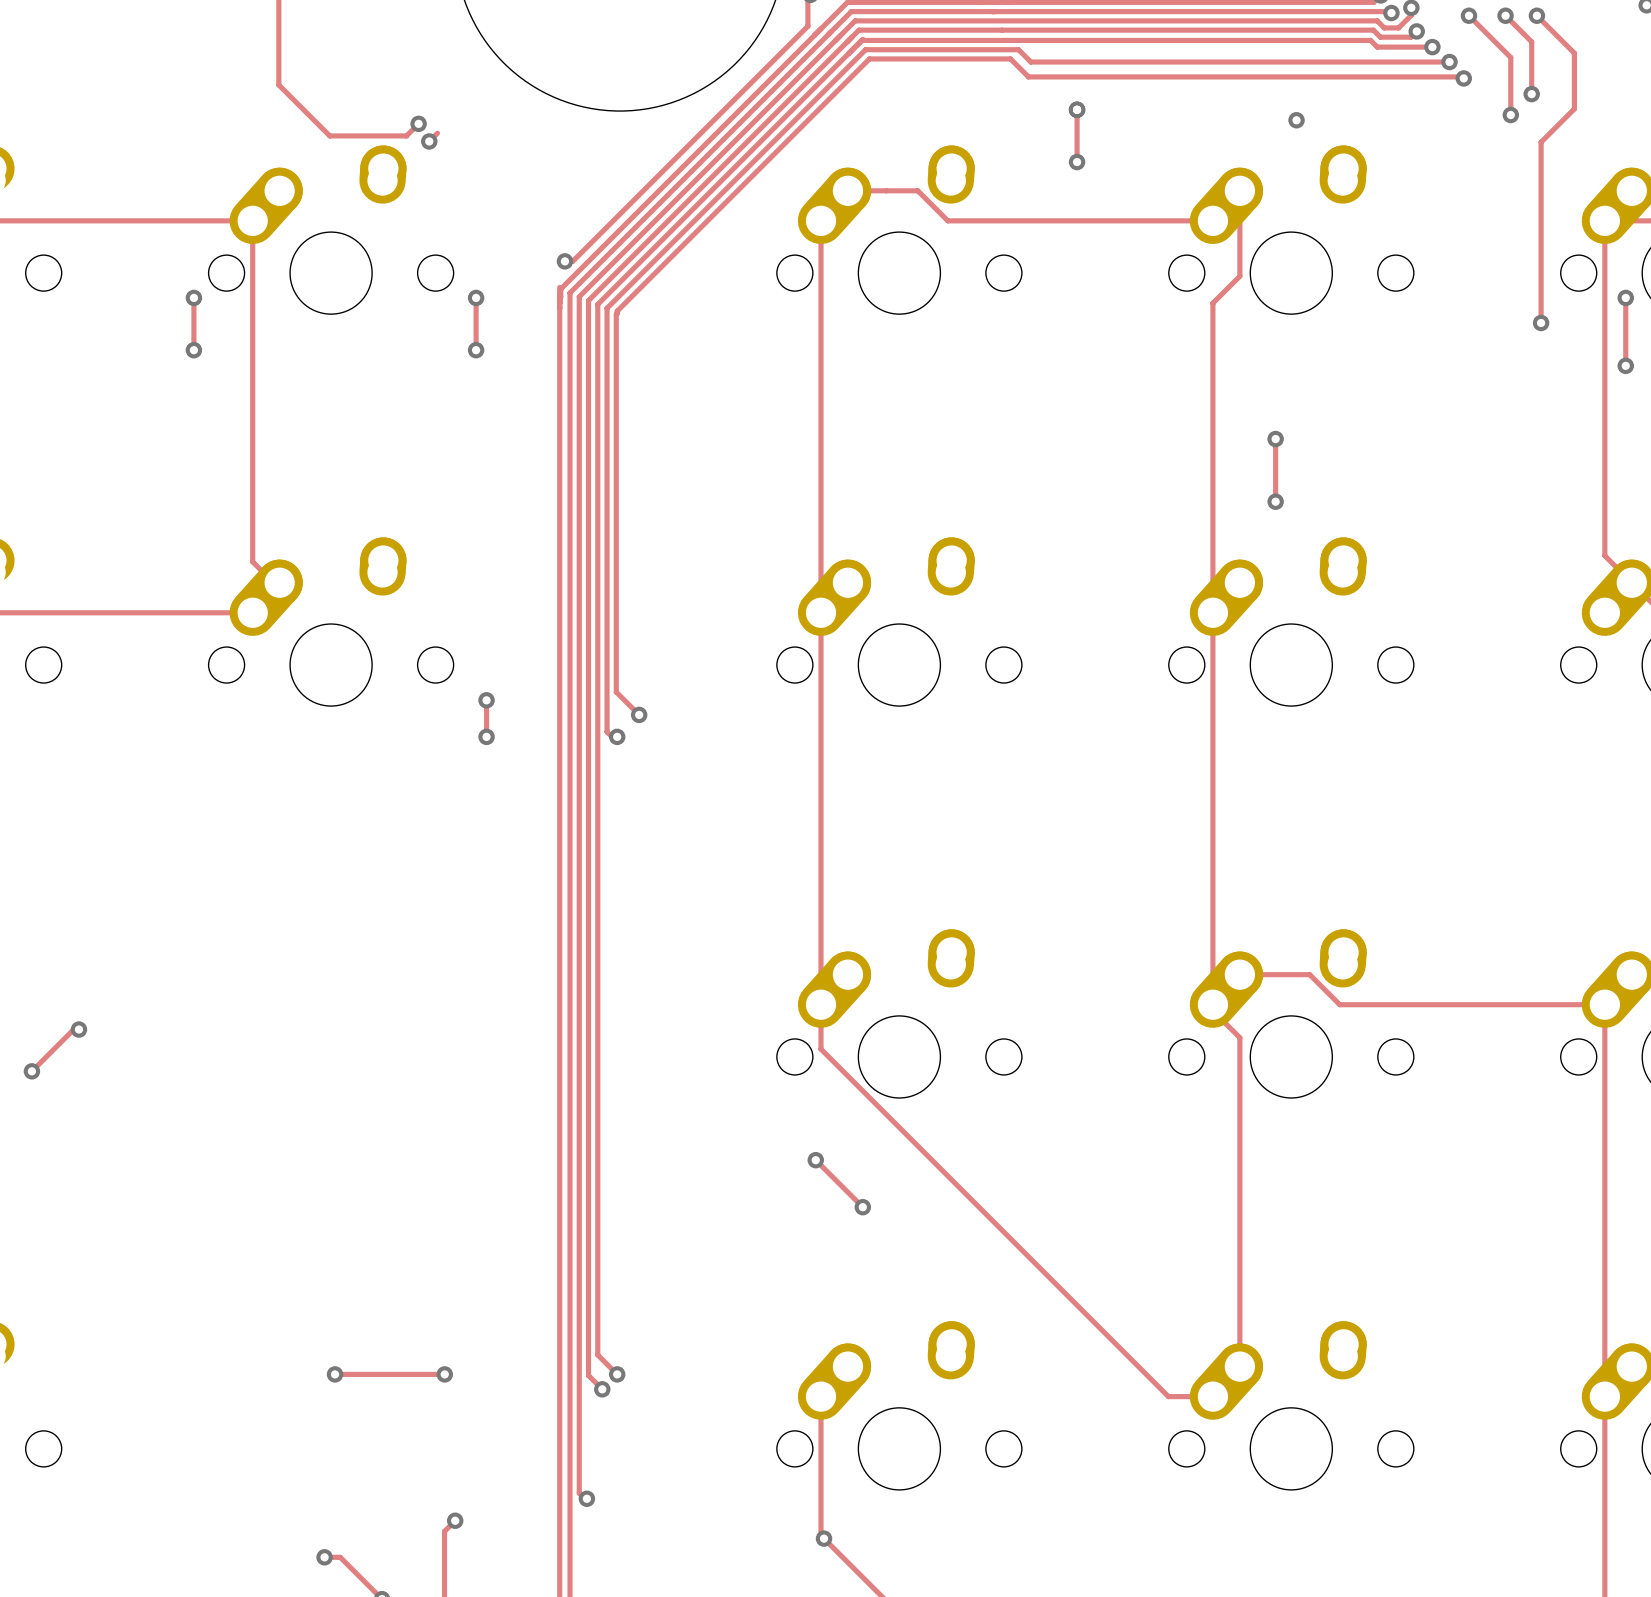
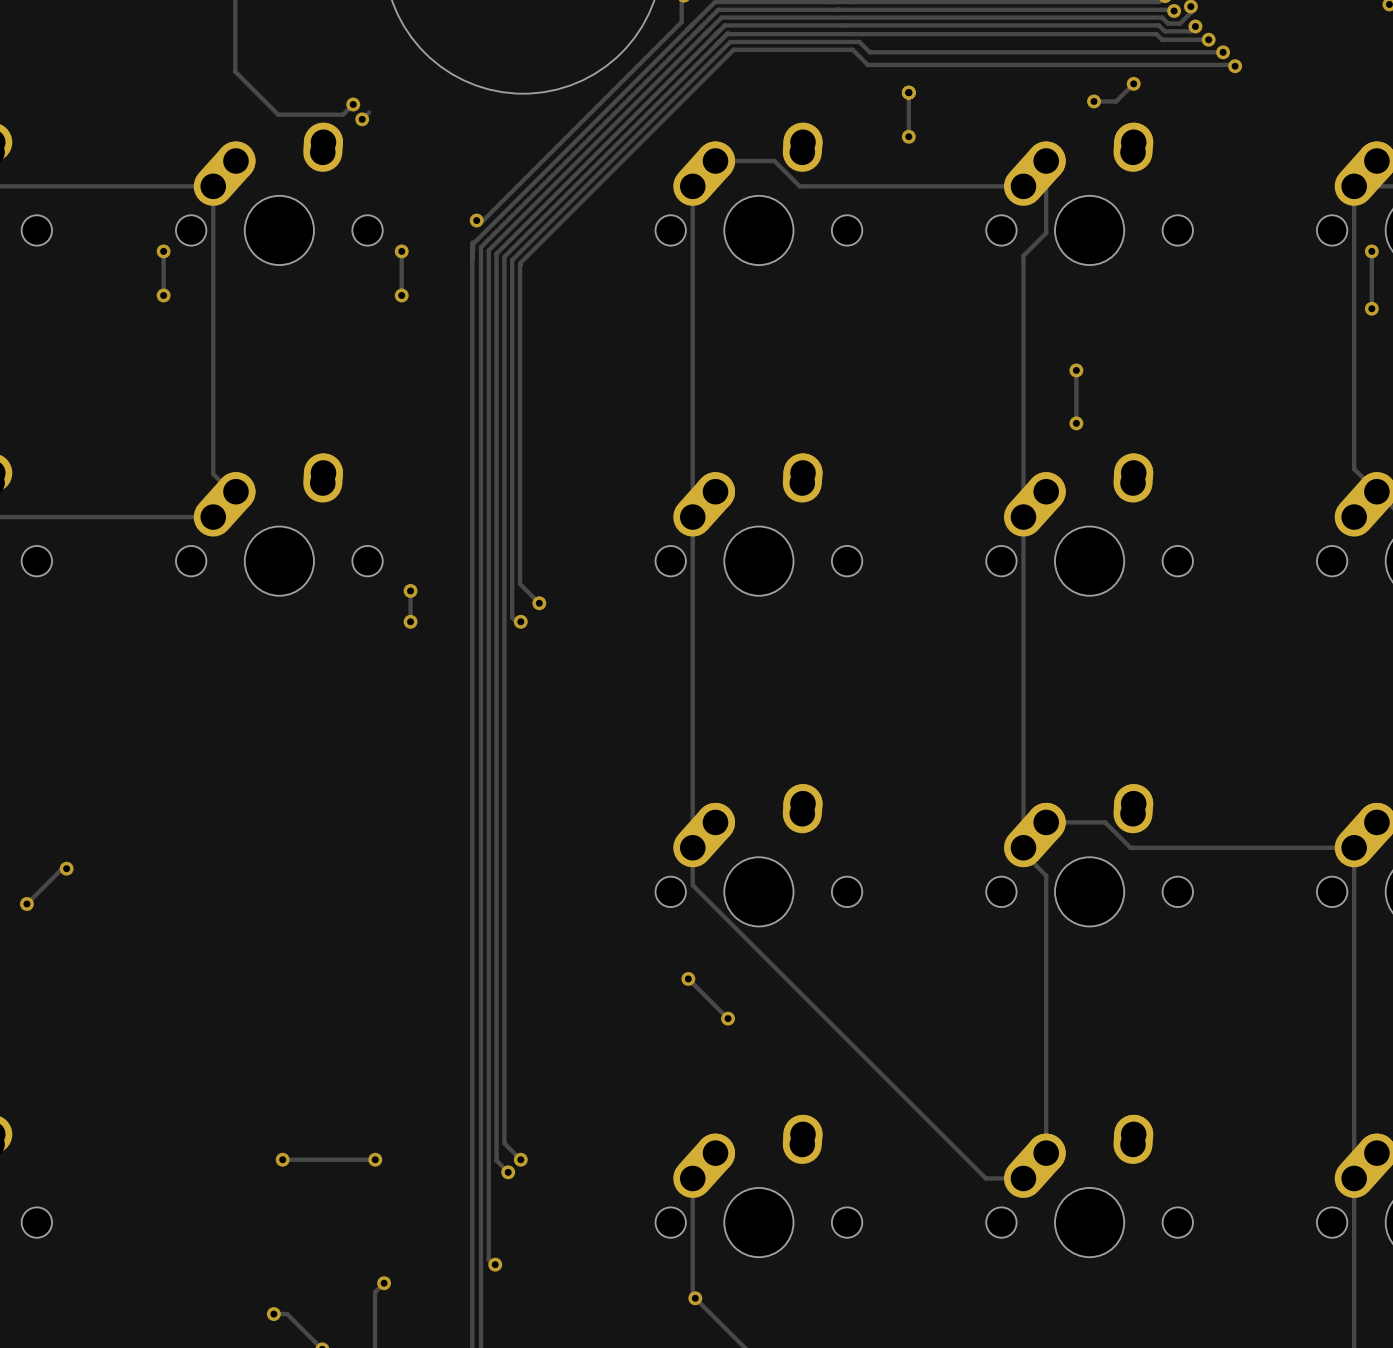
track: (1468, 15) (1510, 57) (1510, 115) -> none
via: (1468, 15) -> none
track: (1505, 15) (1531, 41) (1531, 94) -> none
via: (1505, 15) -> none
track: (1536, 15) (1574, 53) (1574, 108) (1541, 142) (1541, 323) -> none
via: (1536, 15) -> none
via: (1531, 94) -> none
track: none -> (1133, 83) (1116, 101) (1094, 101)
via: none -> (1133, 83)
via: (1510, 115) -> none
via: (1541, 323) -> none

